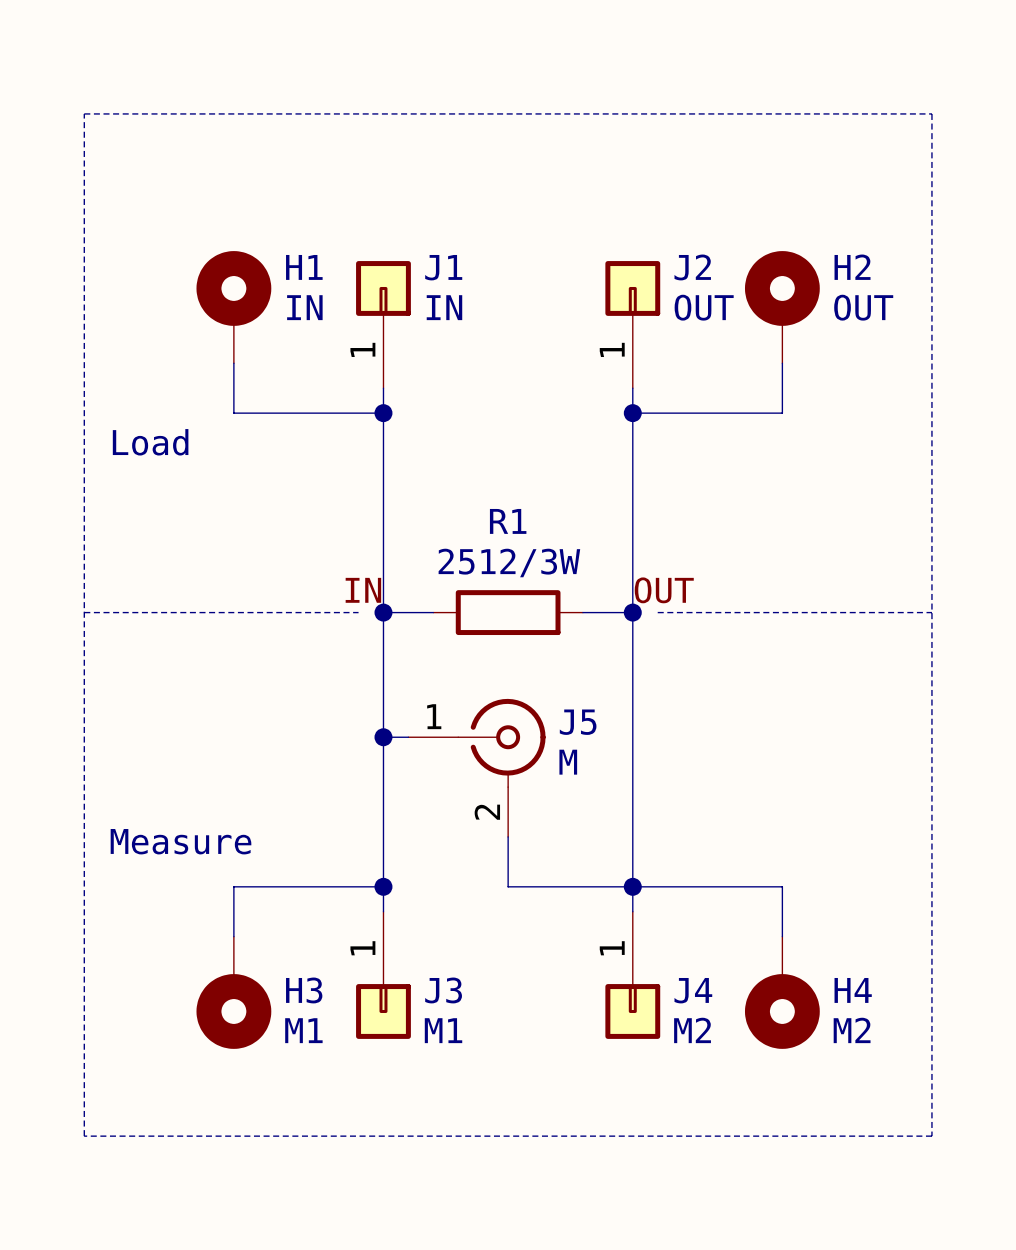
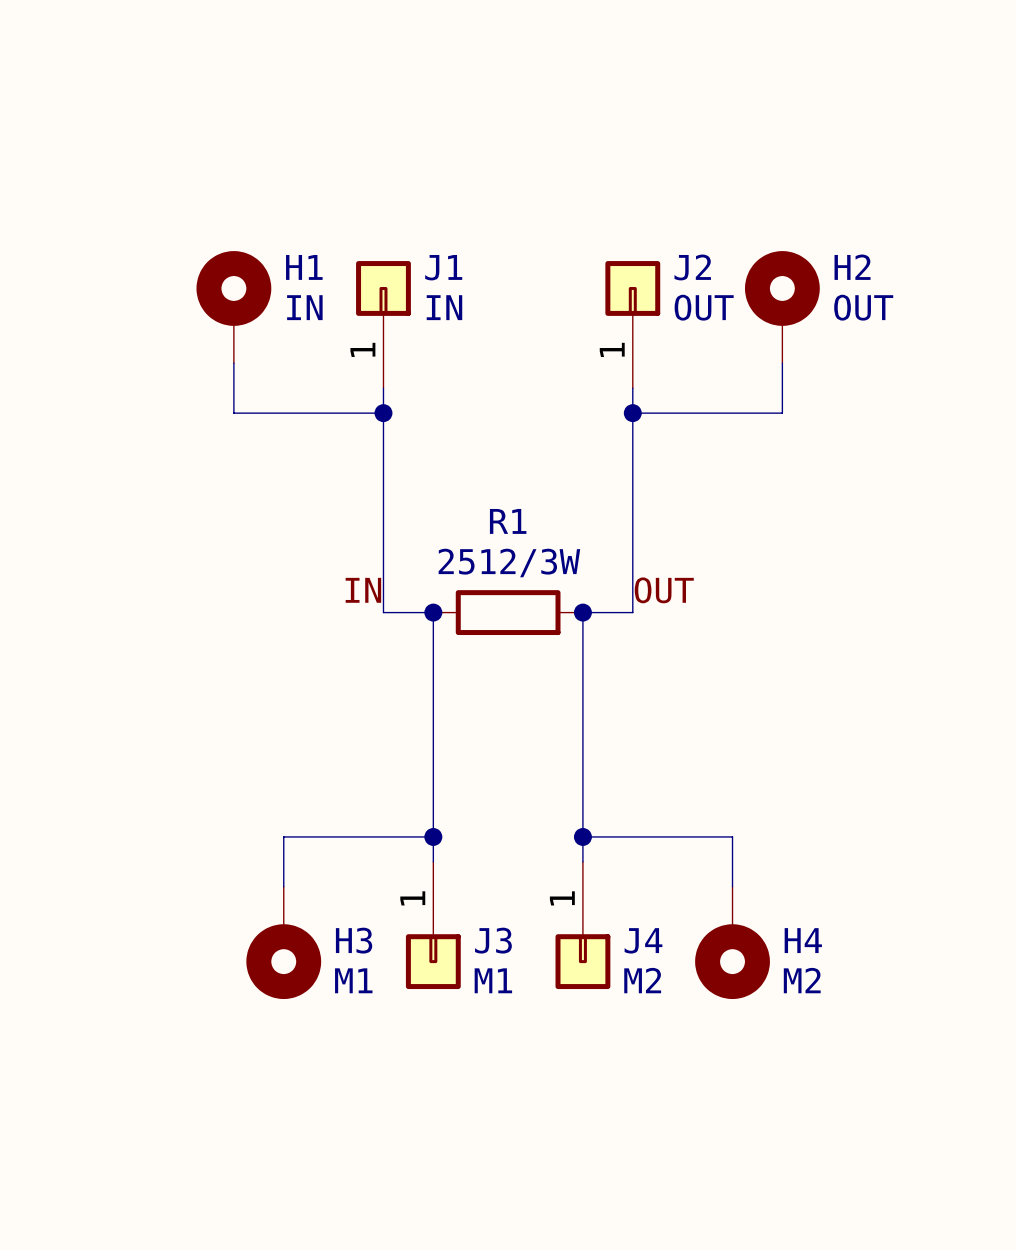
line: (84, 113) (931, 113) (931, 1136) (84, 1136) (84, 113) -> none
text: Load (150, 442) -> none
line: (84, 612) (358, 612) -> none
wire: (383, 612) (383, 911) -> none
junction position: (383, 612) -> (433, 612)
wire: none -> (433, 612) (433, 861)
wire: none -> (582, 612) (582, 861)
wire: (632, 612) (632, 911) -> none
junction position: (632, 612) -> (582, 612)
line: (657, 612) (931, 612) -> none
wire: (383, 737) (408, 737) -> none
junction: (383, 737) -> none
J5: M (476, 767) -> none
junction: none -> (433, 836)
wire: (508, 836) (508, 886) (782, 886) (782, 936) -> none
wire: none -> (582, 836) (732, 836) (732, 886)
text: Measure (181, 841) -> none
wire: (383, 886) (233, 886) (233, 936) -> (433, 836) (283, 836) (283, 886)
junction: (383, 886) -> none
junction position: (632, 886) -> (582, 836)
J3 position: (383, 975) -> (433, 925)
J4 position: (632, 975) -> (582, 925)
H3 position: (233, 992) -> (283, 942)
H4 position: (782, 992) -> (732, 942)

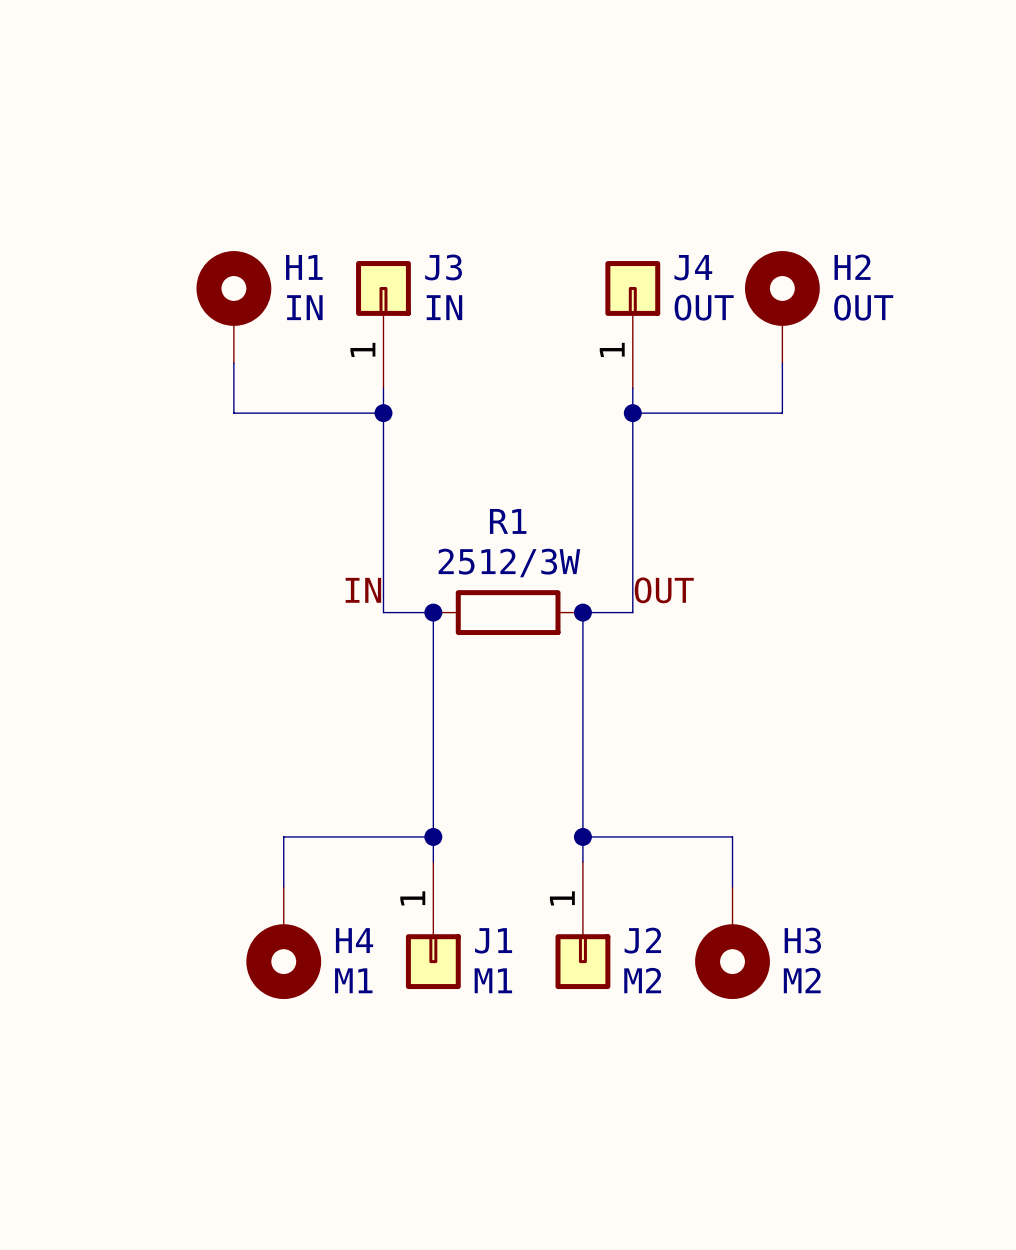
J1 name: J1 (443, 267) -> J3 (443, 267)
J2 name: J2 (692, 267) -> J4 (693, 267)
H3 name: H3 (354, 940) -> H4 (354, 940)
J3 name: J3 (493, 940) -> J1 (493, 940)
J4 name: J4 (643, 940) -> J2 (642, 940)
H4 name: H4 (803, 940) -> H3 (802, 940)

